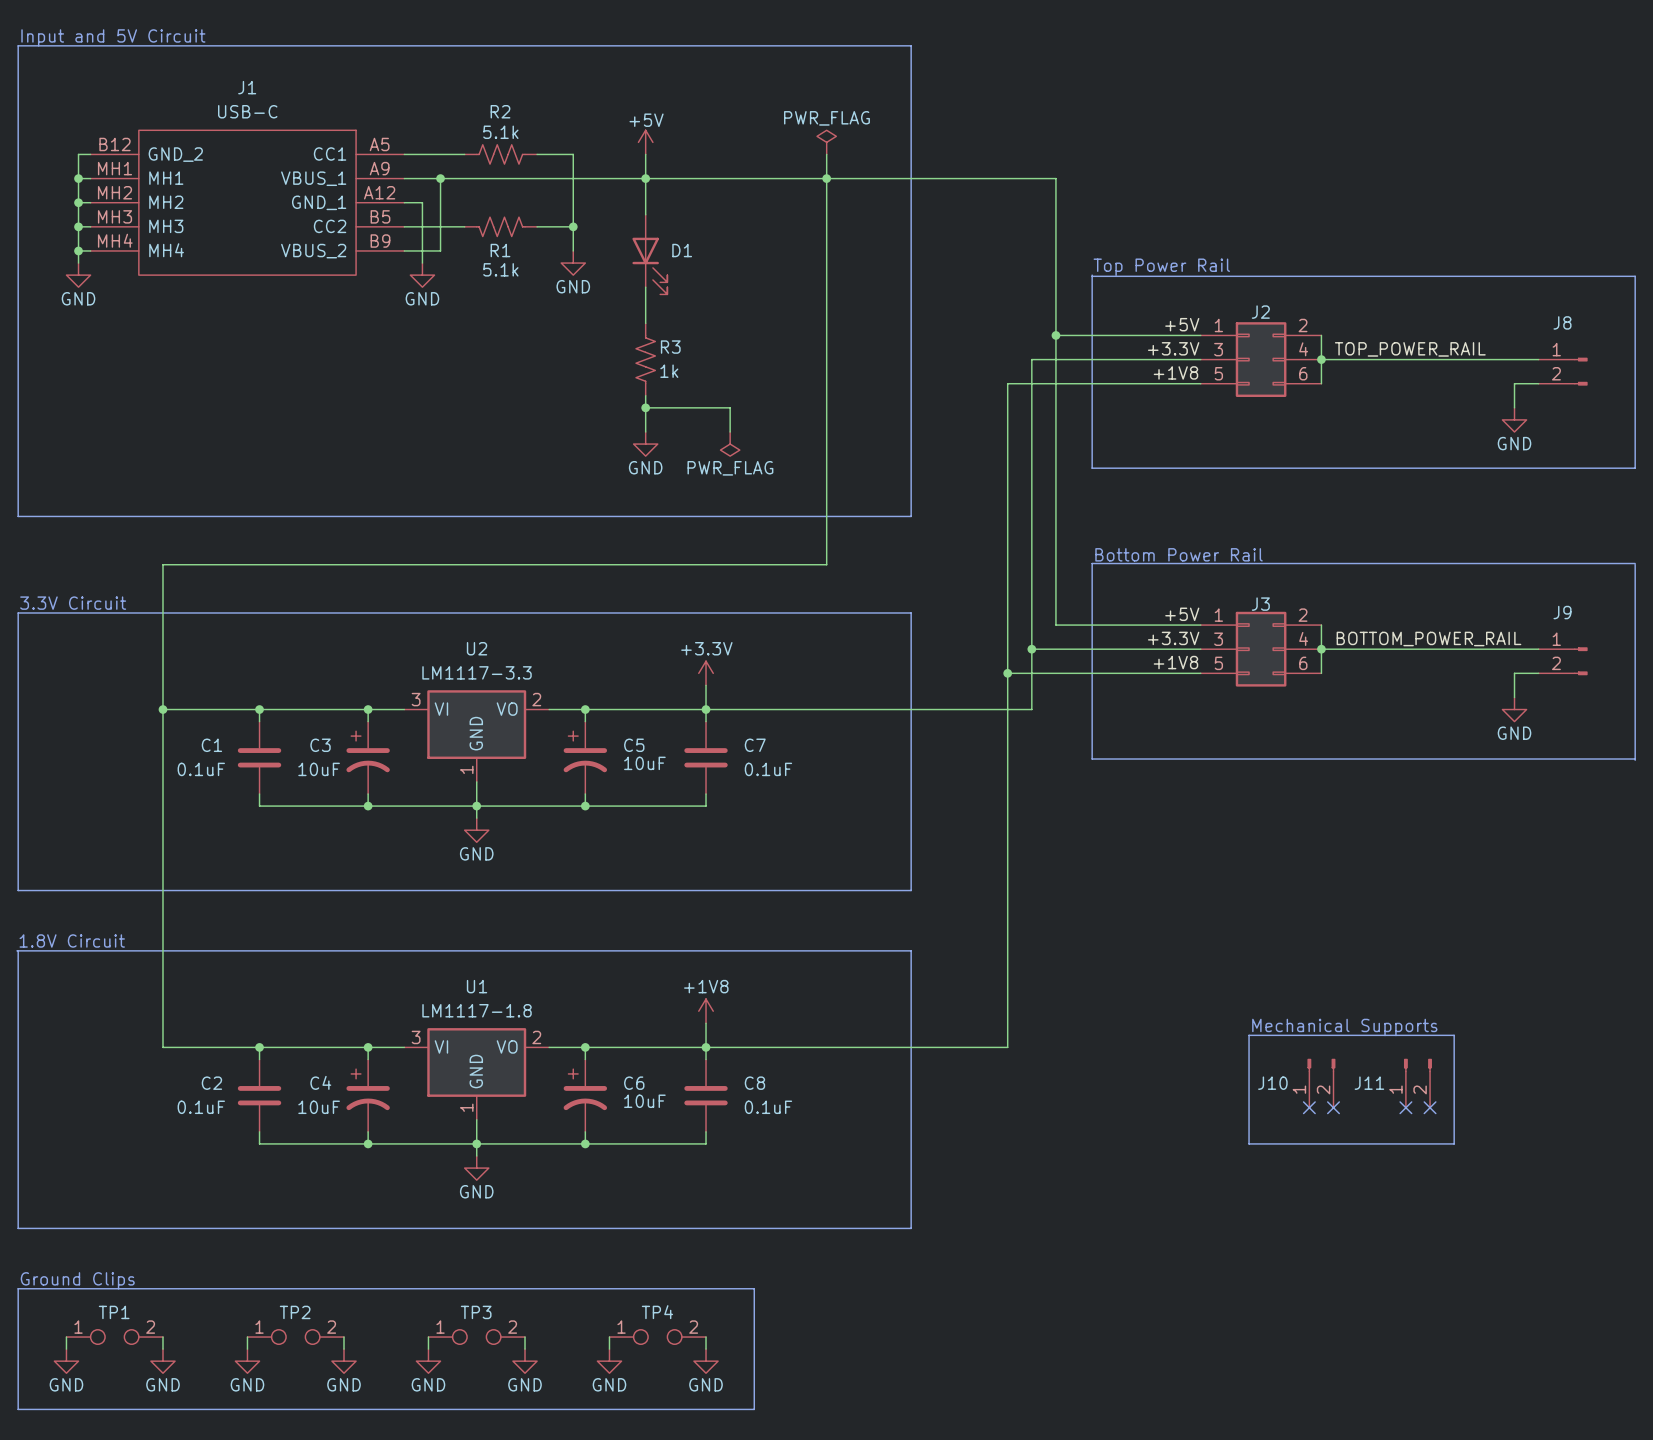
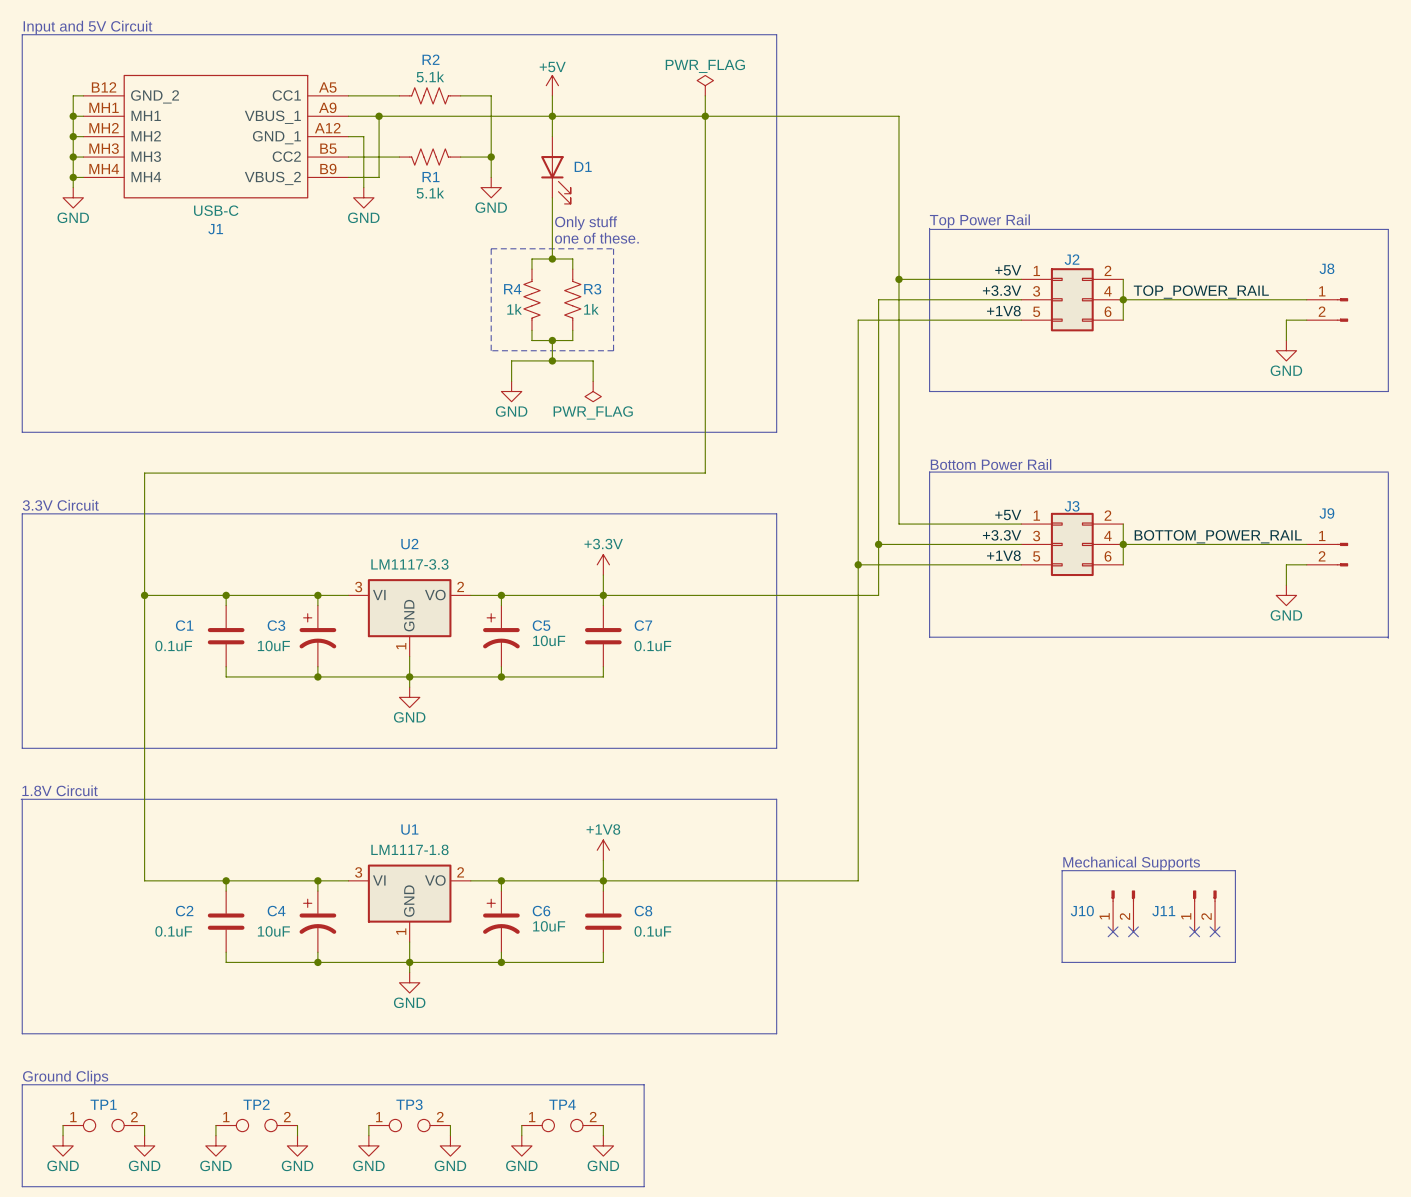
J1 name position: J1 (247, 87) -> J1 (215, 229)
J1 value position: USB-C (247, 111) -> USB-C (216, 210)
wire: none -> (705, 95) (705, 126)
junction: none -> (73, 116)
power symbol position: +5V (645, 142) -> +5V (552, 85)
power symbol position: PWR_FLAG (826, 142) -> PWR_FLAG (705, 85)
wire: (78, 154) (90, 154) -> (73, 126) (73, 95) (83, 95)
wire: (404, 154) (464, 154) -> (348, 95) (399, 95)
R2 position: (500, 154) -> (430, 95)
wire: (537, 154) (573, 154) -> (460, 95) (491, 95) (491, 126)
junction: none -> (73, 136)
wire: (78, 178) (90, 178) -> (73, 116) (83, 116)
junction: (78, 178) -> none
wire: (404, 178) (1055, 178) -> (348, 116) (898, 116) (898, 146)
junction position: (440, 178) -> (379, 116)
junction position: (645, 178) -> (552, 116)
junction position: (826, 178) -> (705, 116)
wire: none -> (73, 157) (83, 157)
junction: none -> (73, 157)
wire: (78, 202) (90, 202) -> (73, 136) (83, 136)
junction: (78, 202) -> none
J1 position: (247, 202) -> (215, 136)
wire: (404, 202) (422, 202) -> (348, 136) (363, 136) (363, 167)
junction: none -> (73, 177)
wire: (440, 214) (440, 250) (404, 250) -> (379, 177) (348, 177)
junction: (78, 226) -> none
wire: (90, 226) (78, 226) (78, 263) -> none
wire: (404, 226) (464, 226) -> (348, 157) (399, 157)
wire: (422, 226) (422, 263) -> (379, 116) (379, 146)
R1 position: (500, 226) -> (430, 157)
wire: (537, 226) (573, 226) -> (460, 157) (491, 157)
junction position: (573, 226) -> (491, 157)
wire: (78, 250) (90, 250) -> (73, 177) (83, 177)
junction: (78, 250) -> none
D1 position: (649, 254) -> (555, 170)
power symbol position: GND (573, 263) -> GND (491, 187)
text: none -> Only stuff (586, 223)
power symbol position: GND (78, 275) -> GND (73, 197)
power symbol position: GND (422, 275) -> GND (363, 197)
text: none -> one of these. (596, 238)
line: none -> (491, 248) (613, 248) (613, 350) (491, 350) (491, 248)
wire: (645, 311) (645, 323) -> none
junction: none -> (552, 258)
wire: none -> (531, 269) (531, 258) (572, 258) (572, 269)
R4: none -> 1k (531, 299)
R3 position: (645, 359) -> (572, 299)
wire: (645, 395) (645, 407) -> (531, 330) (531, 340) (552, 340)
wire: (669, 407) (730, 407) (730, 431) -> (572, 340) (572, 330)
junction: none -> (552, 360)
power symbol position: GND (645, 444) -> GND (511, 391)
power symbol position: PWR_FLAG (730, 444) -> PWR_FLAG (593, 391)
wire: none -> (511, 381) (511, 360) (593, 360) (593, 381)

